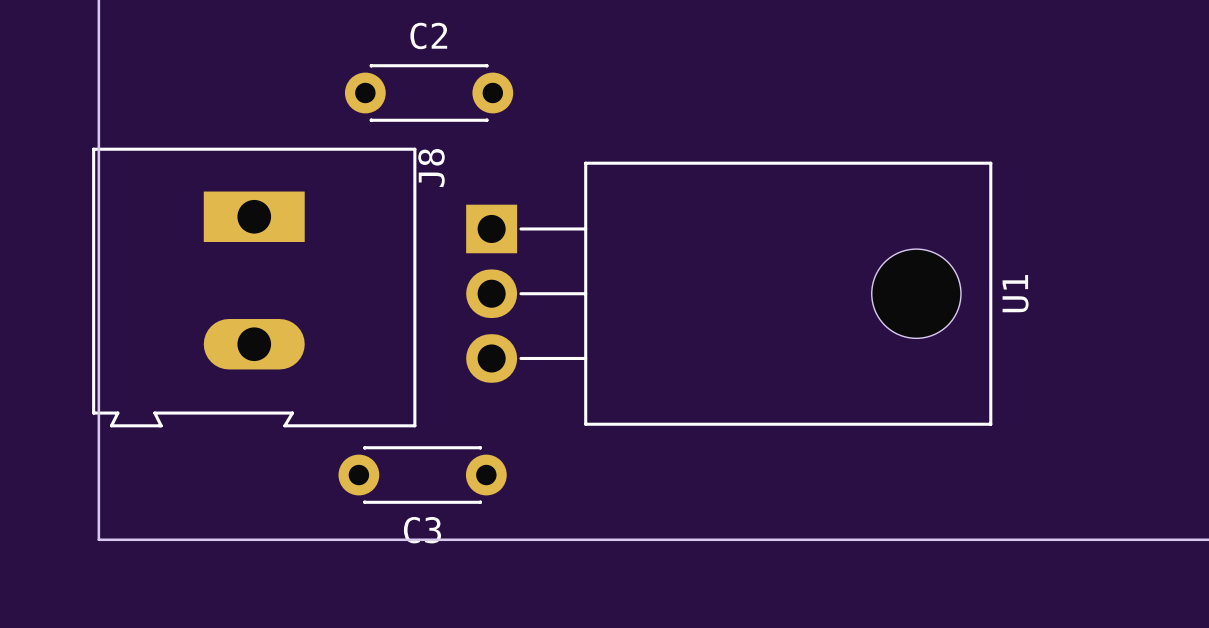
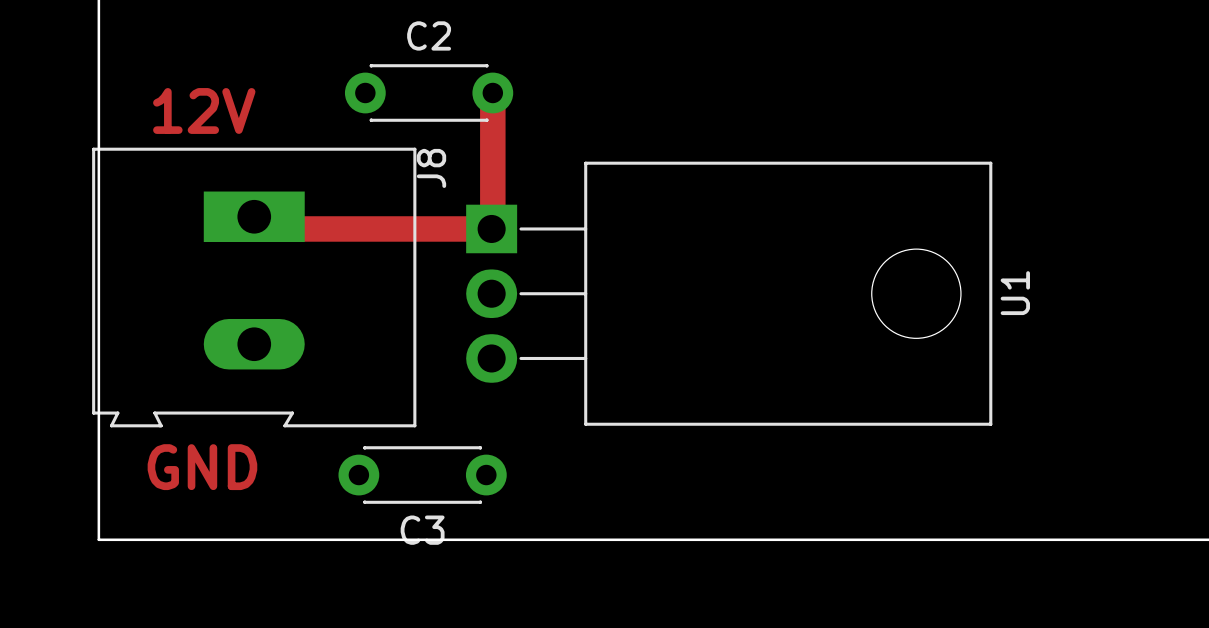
track: none -> (492, 92) (491, 228) (279, 228) (267, 216)
text: none -> 12V (204, 110)
text: none -> GND (202, 467)

